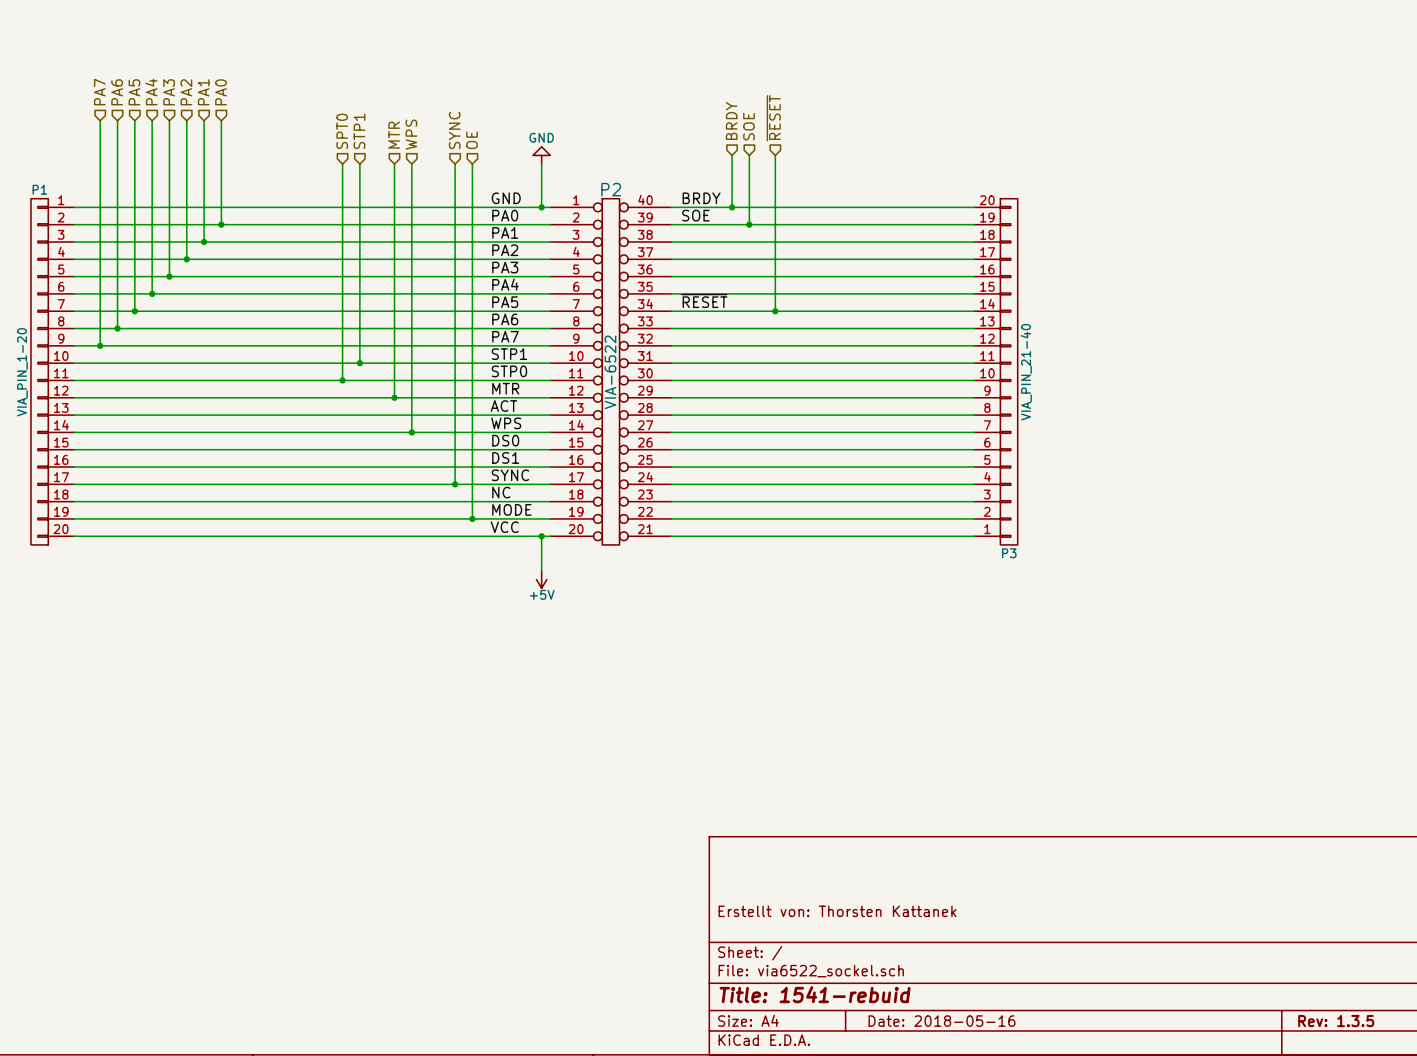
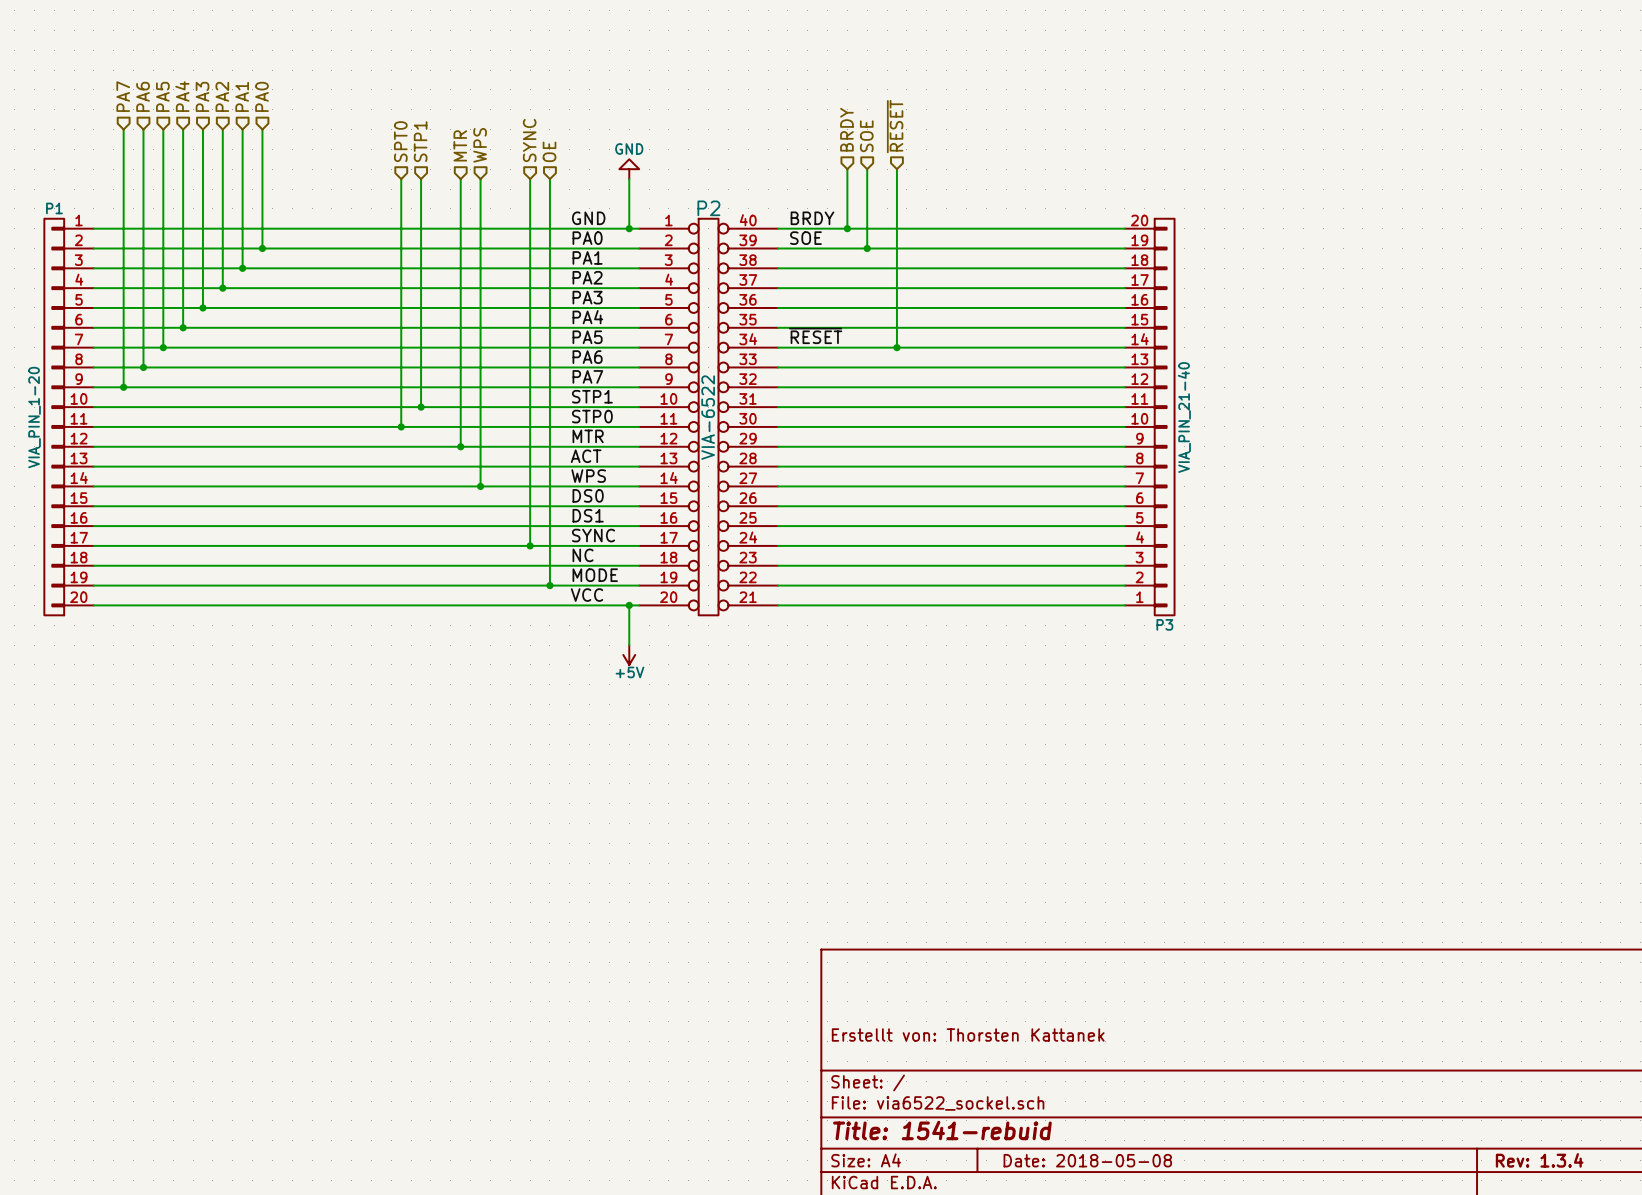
title block: Date: 2018-05-16 (941, 1021) -> Date: 2018-05-08 (1087, 1160)
title block: Rev: 1.3.5 (1336, 1021) -> Rev: 1.3.4 (1539, 1160)

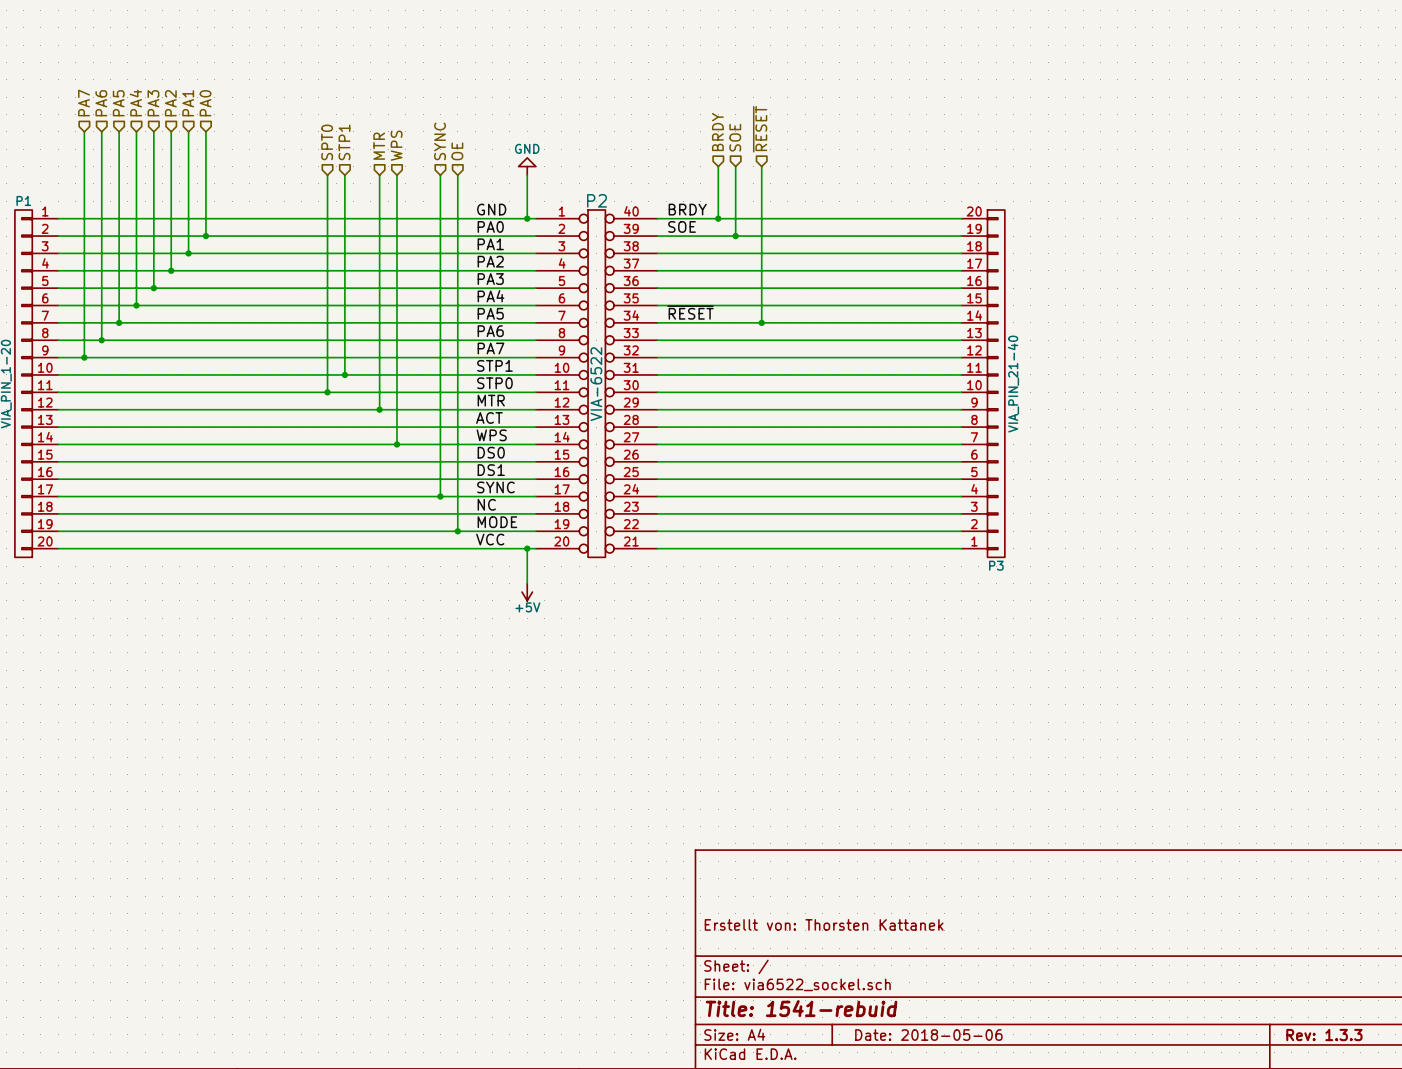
title block: Date: 2018-05-08 (1087, 1160) -> Date: 2018-05-06 (928, 1035)
title block: Rev: 1.3.4 (1539, 1160) -> Rev: 1.3.3 (1324, 1035)

